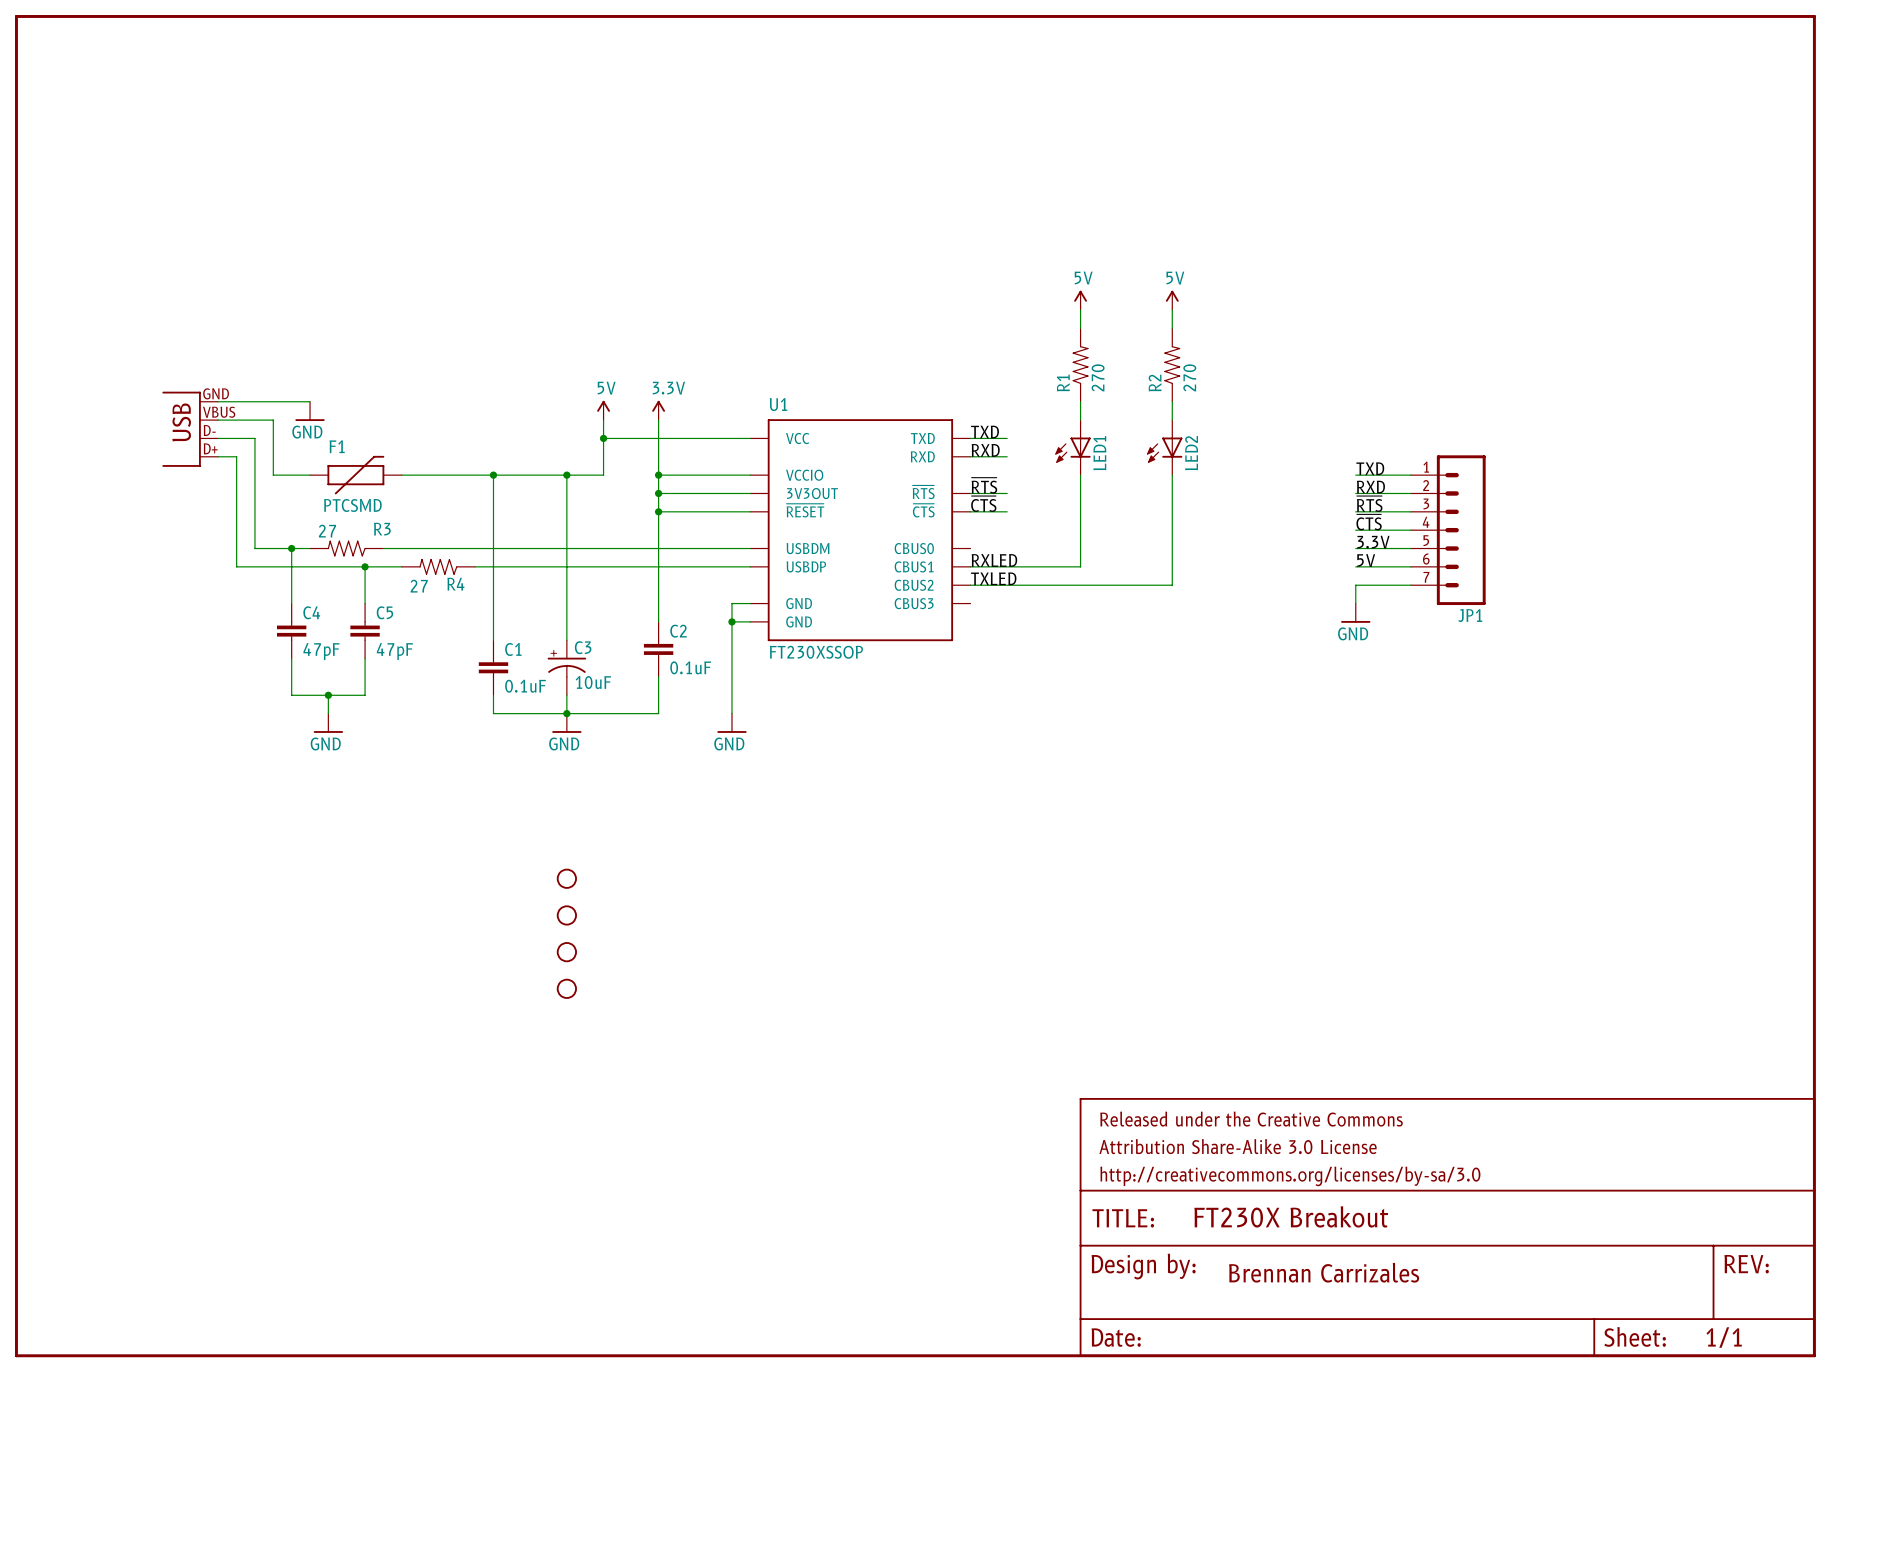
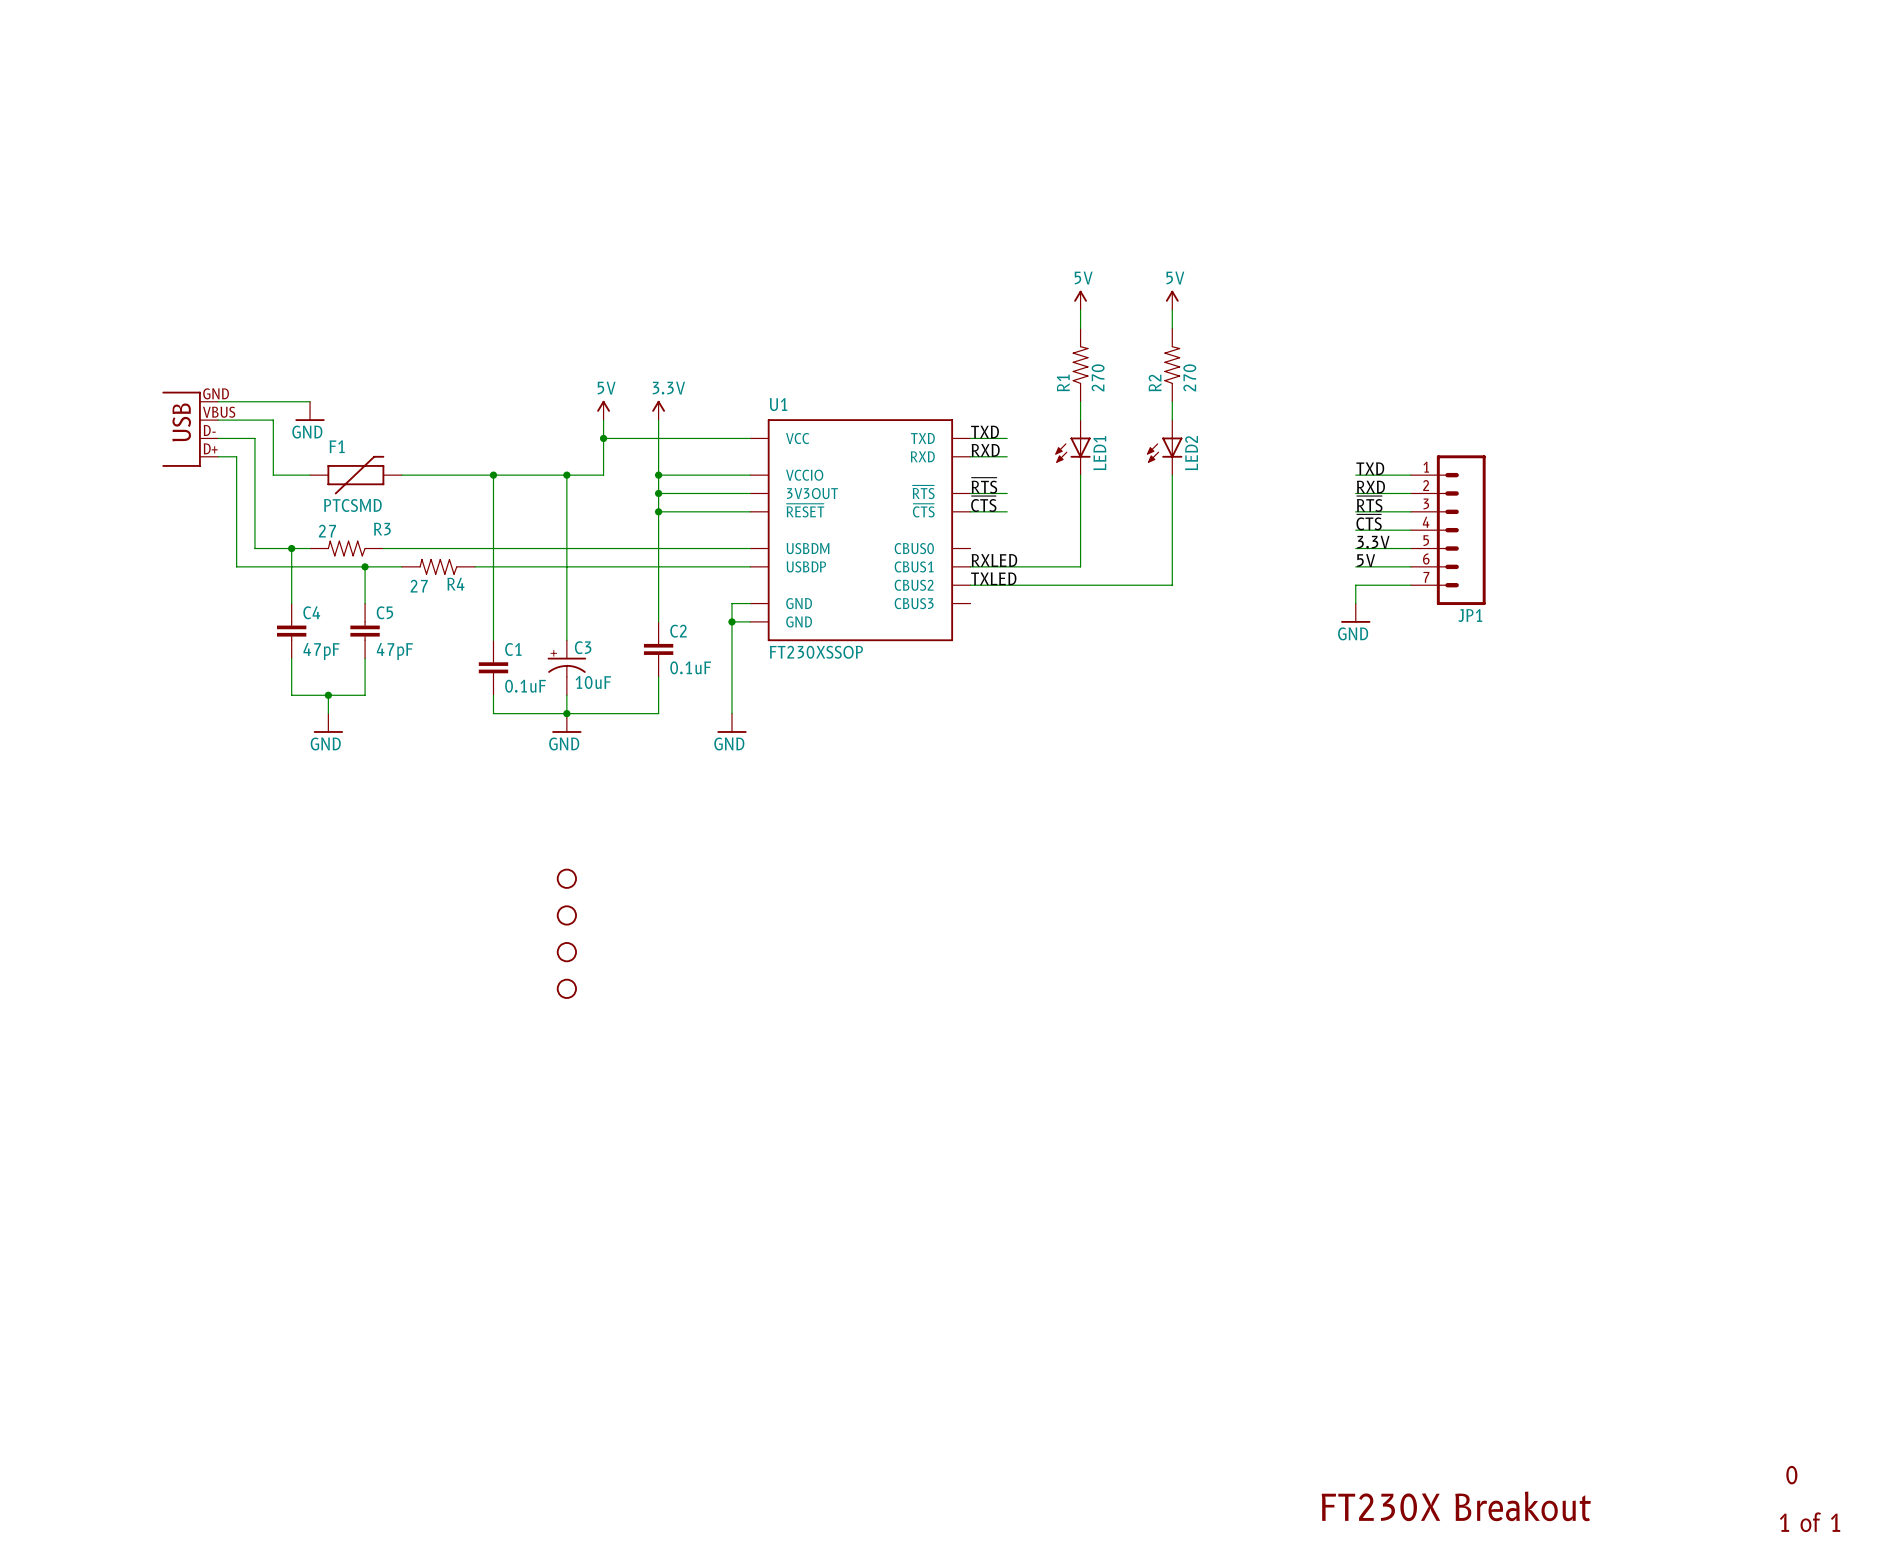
part: (915, 686) -> none
part: (1447, 1227) -> none
text: Brennan Carrizales (1324, 1272) -> none
text: none -> 0 (1791, 1475)
text: none -> FT230X Breakout (1456, 1506)
text: none -> 1 of 1 (1810, 1522)

